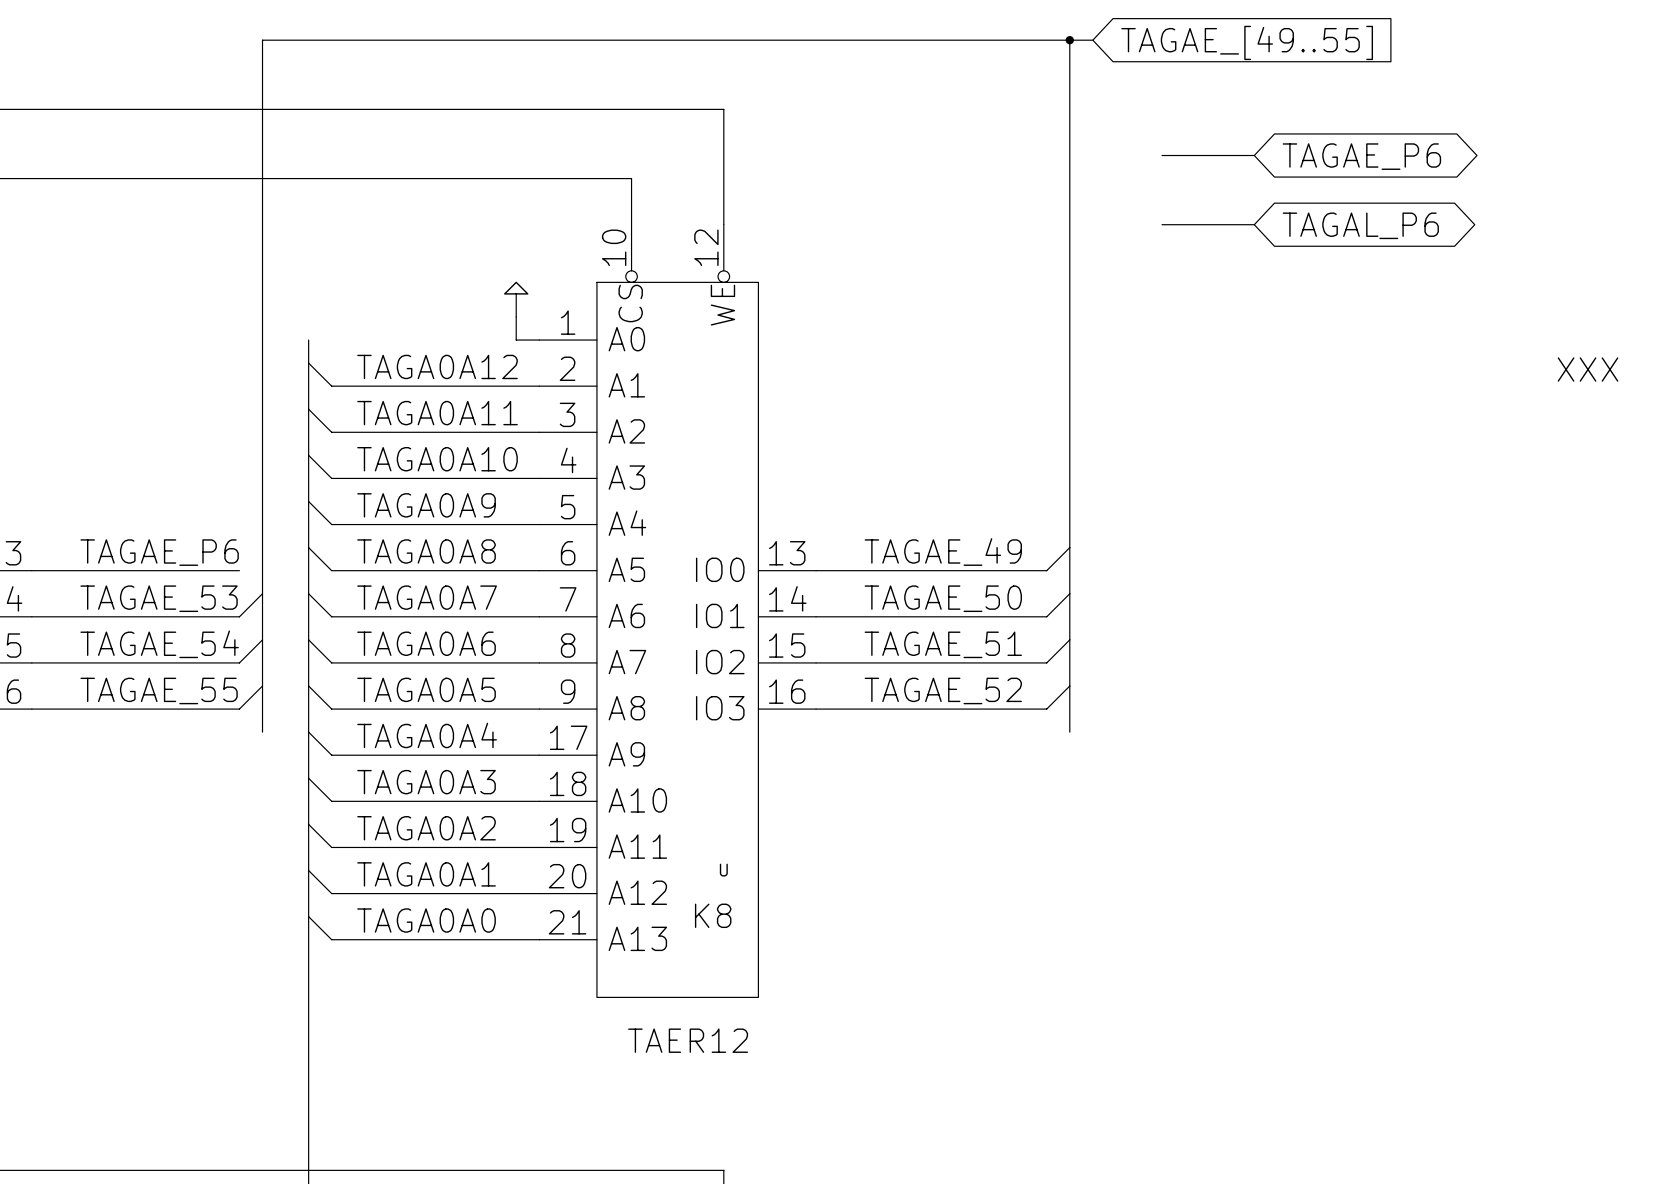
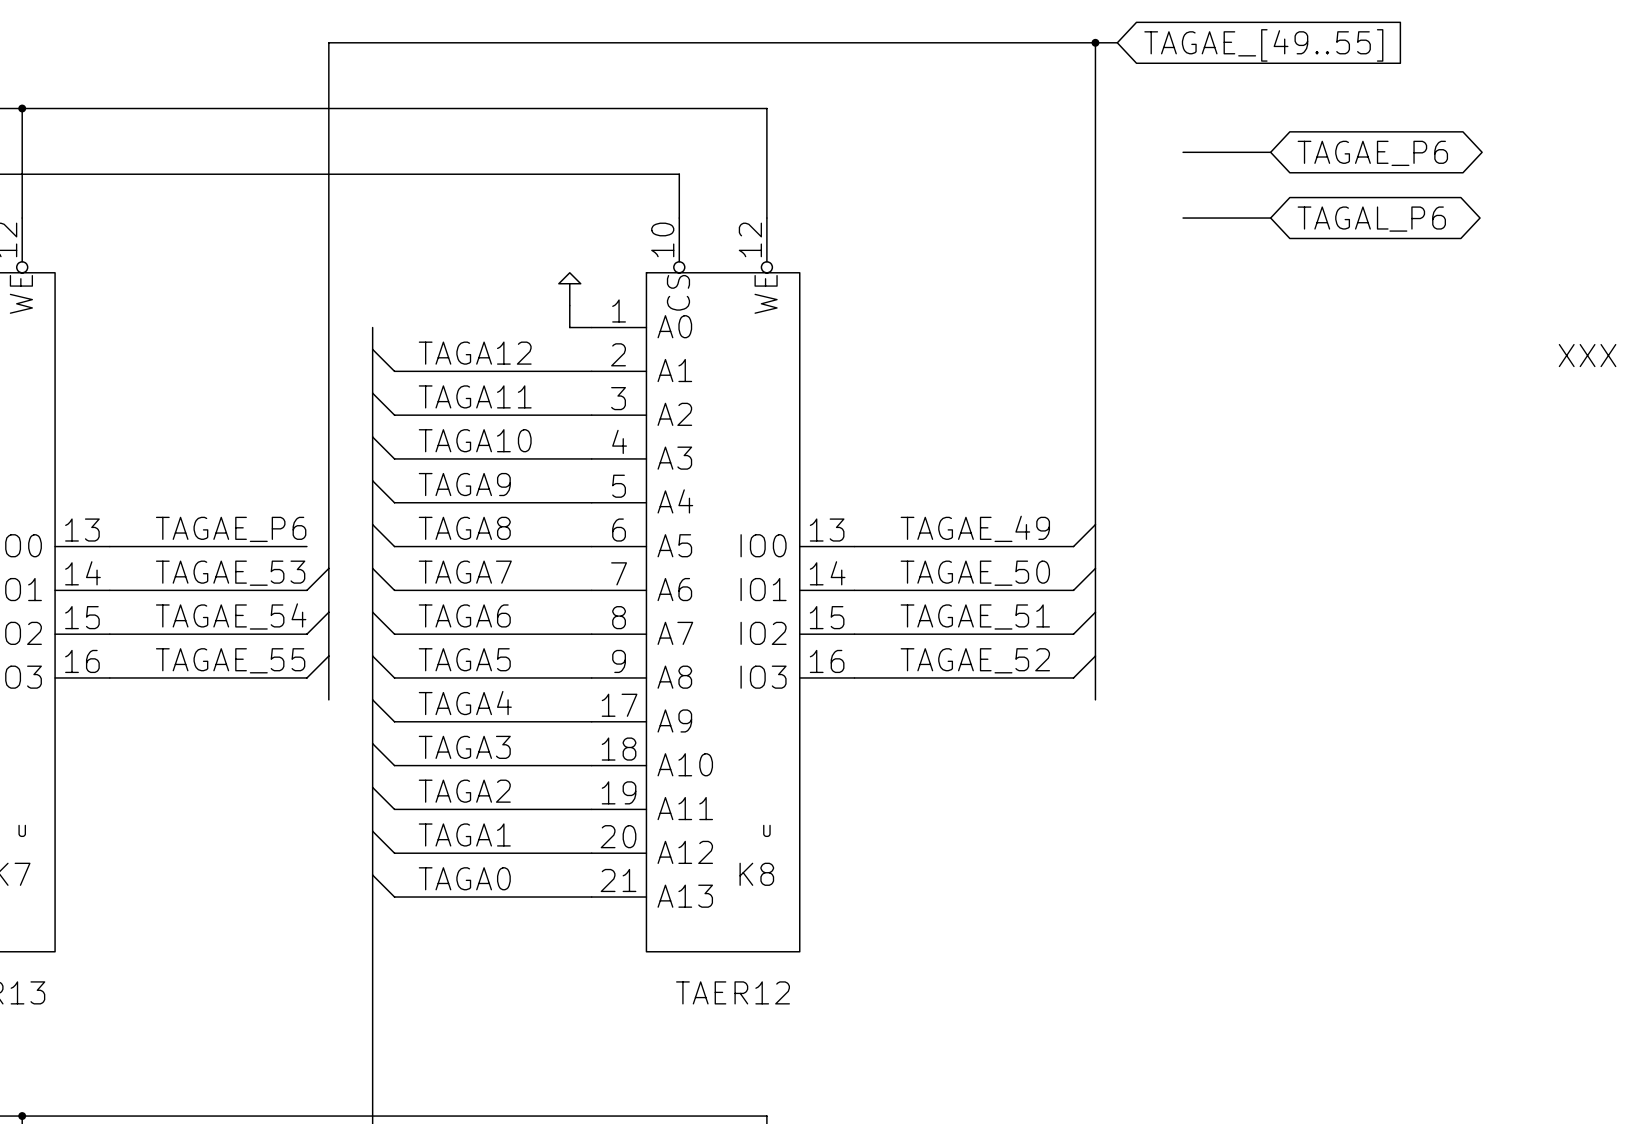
label: TAGA0A12 (437, 366) -> TAGA12 (475, 353)
label: TAGA0A11 (437, 413) -> TAGA11 (475, 396)
label: TAGA0A10 (437, 459) -> TAGA10 (475, 440)
label: TAGA0A9 (426, 505) -> TAGA9 (464, 484)
label: TAGA0A8 (426, 551) -> TAGA8 (464, 528)
label: TAGA0A7 (427, 597) -> TAGA7 (465, 572)
label: TAGA0A6 (426, 643) -> TAGA6 (464, 615)
label: TAGA0A5 (426, 689) -> TAGA5 (464, 659)
label: TAGA0A4 (427, 735) -> TAGA4 (465, 703)
label: TAGA0A3 (426, 782) -> TAGA3 (464, 747)
label: TAGA0A2 (426, 828) -> TAGA2 (464, 791)
label: TAGA0A1 (426, 874) -> TAGA1 (464, 834)
label: TAGA0A0 (426, 920) -> TAGA0 (464, 878)

